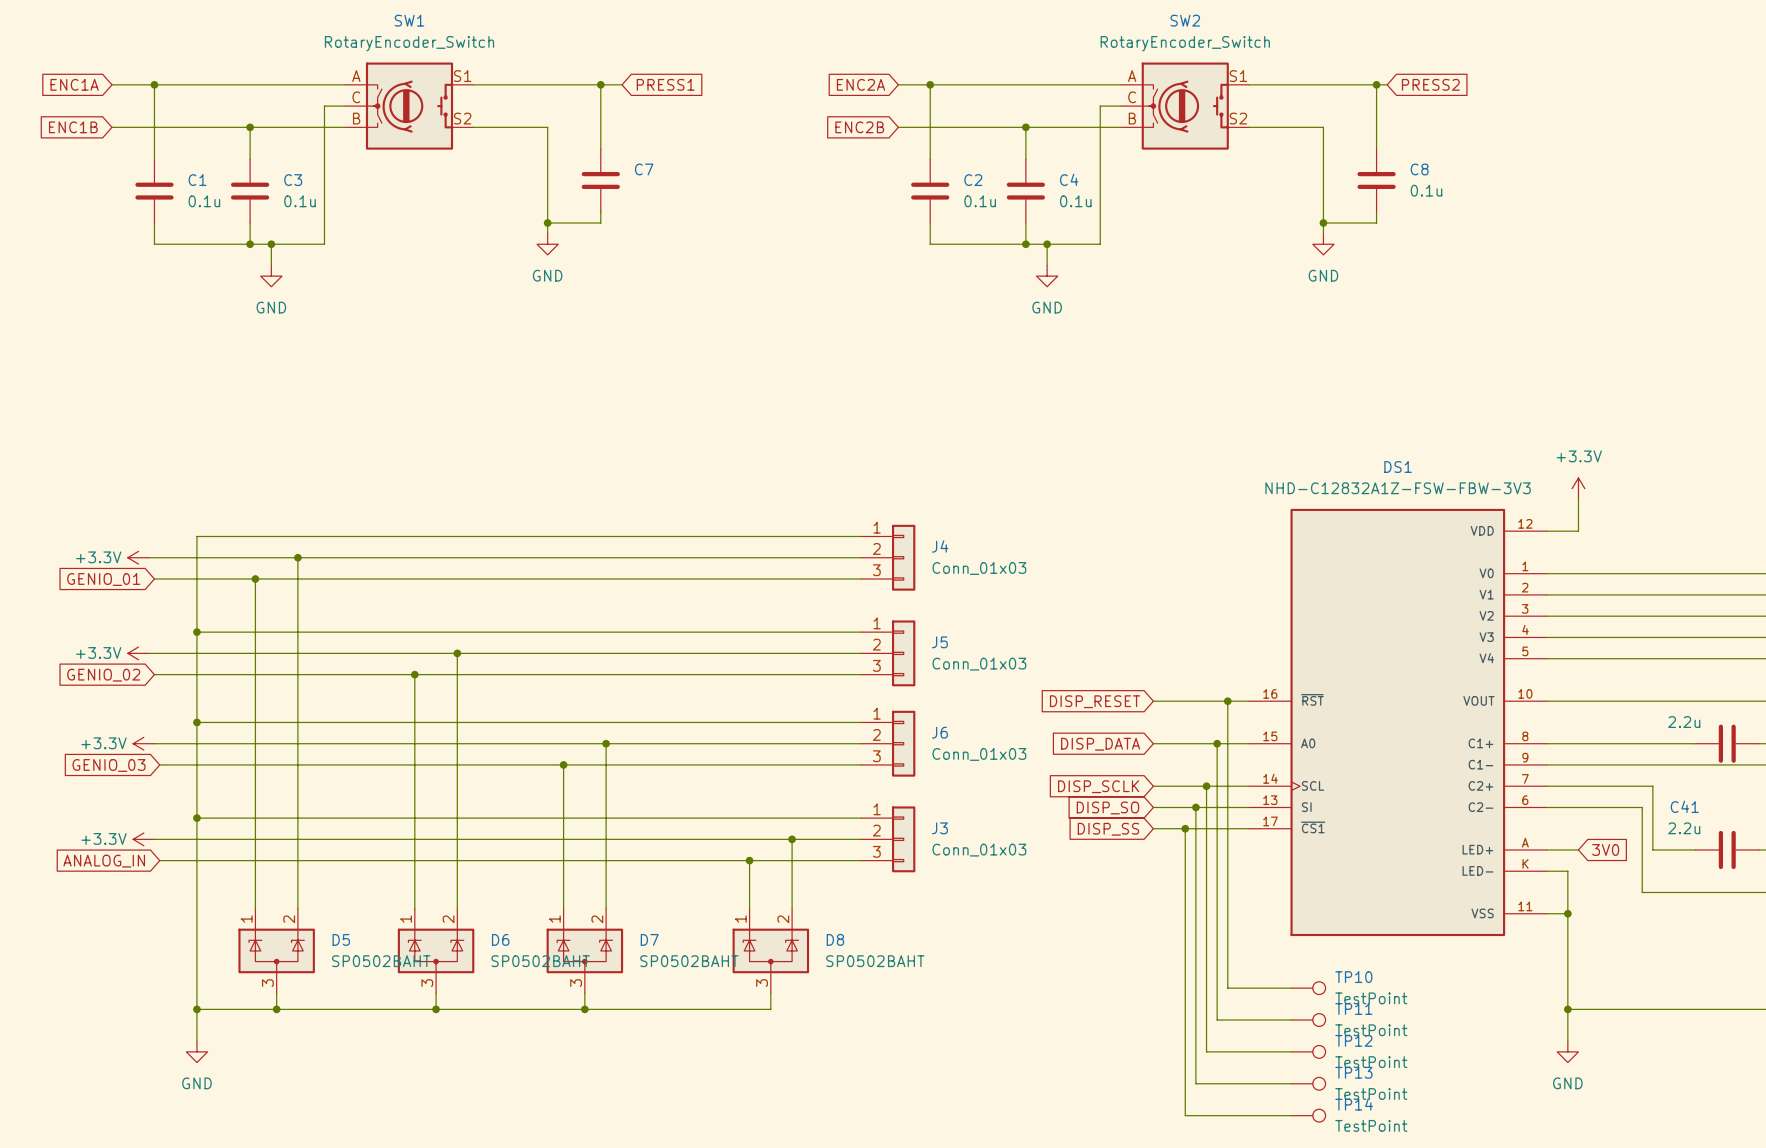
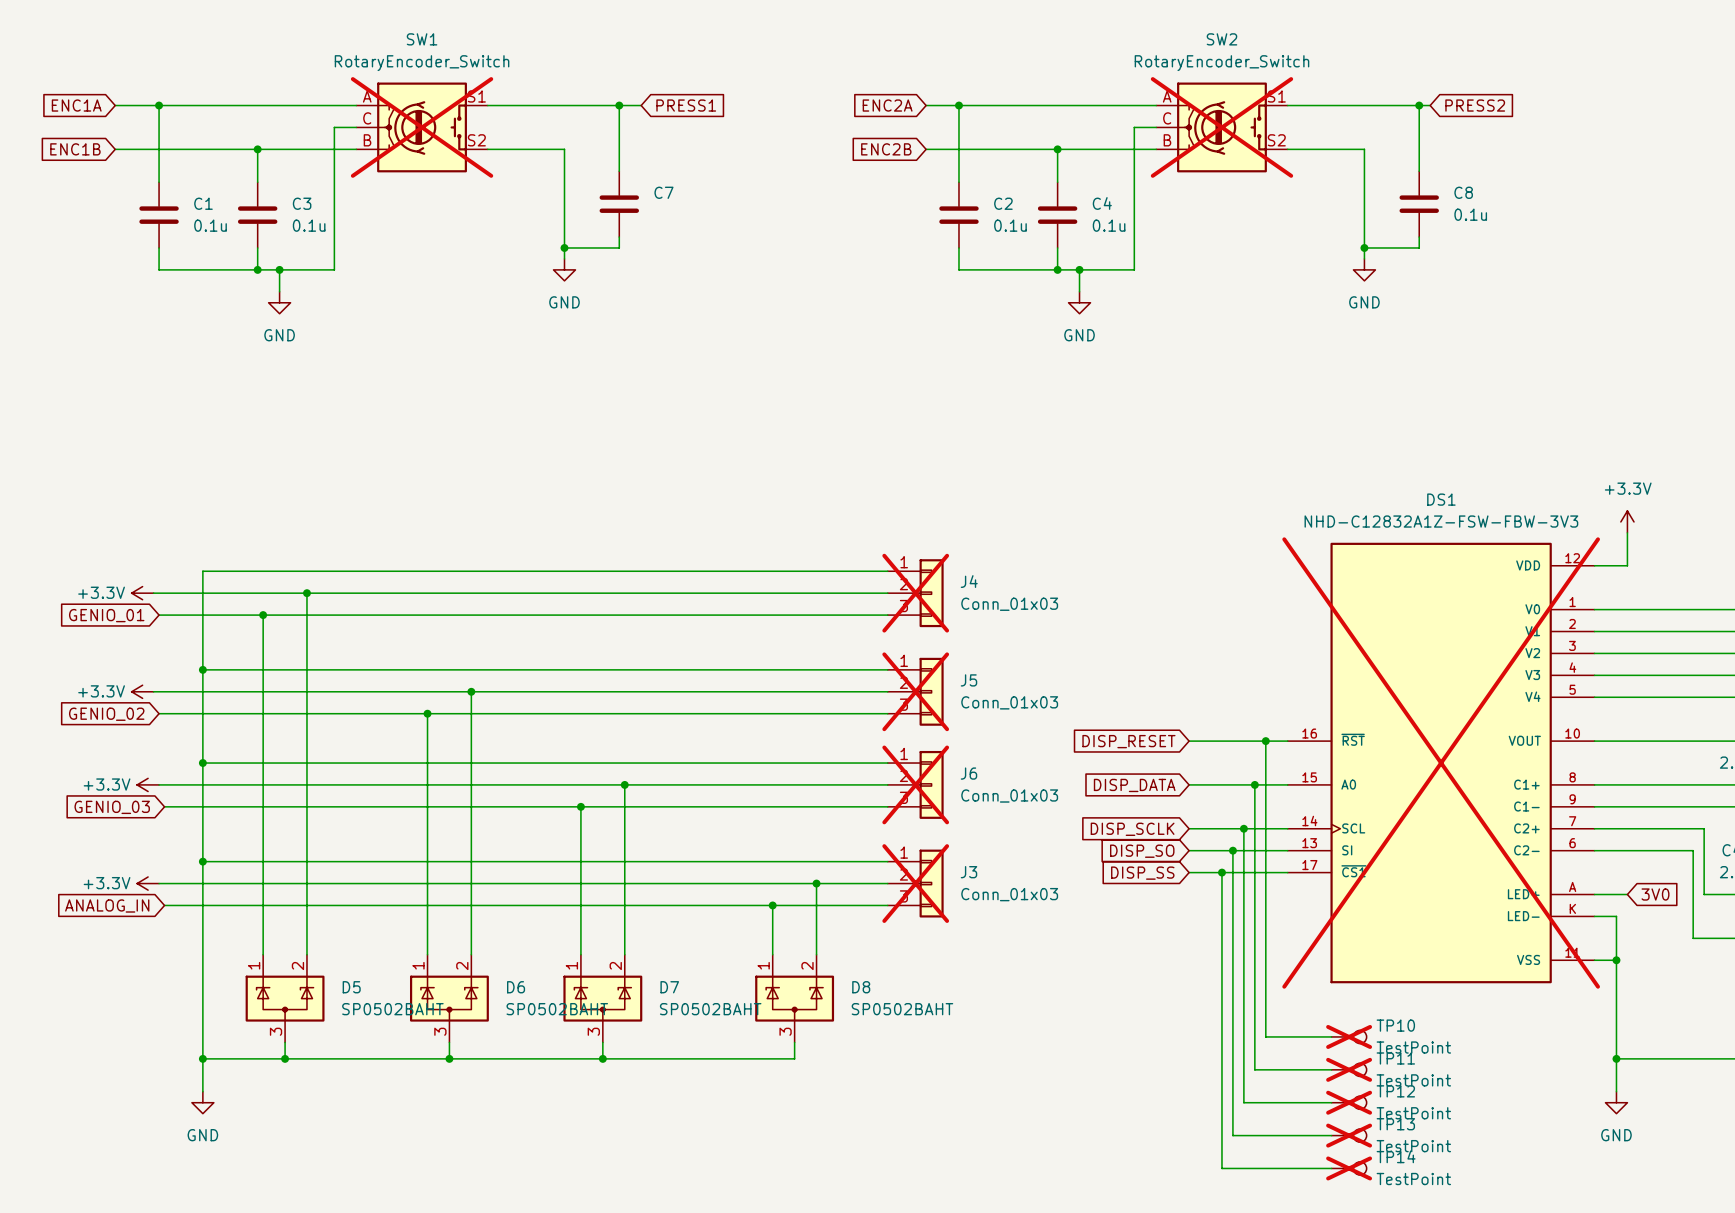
SW1 do-not-place cross: none -> (422, 127)
SW2 do-not-place cross: none -> (1221, 127)
J4 do-not-place cross: none -> (915, 593)
J5 do-not-place cross: none -> (915, 691)
DS1 do-not-place cross: none -> (1441, 763)
J6 do-not-place cross: none -> (915, 784)
J3 do-not-place cross: none -> (915, 883)
TP10 do-not-place cross: none -> (1349, 1036)
TP11 do-not-place cross: none -> (1349, 1069)
TP12 do-not-place cross: none -> (1349, 1102)
TP13 do-not-place cross: none -> (1349, 1135)
TP14 do-not-place cross: none -> (1349, 1168)

